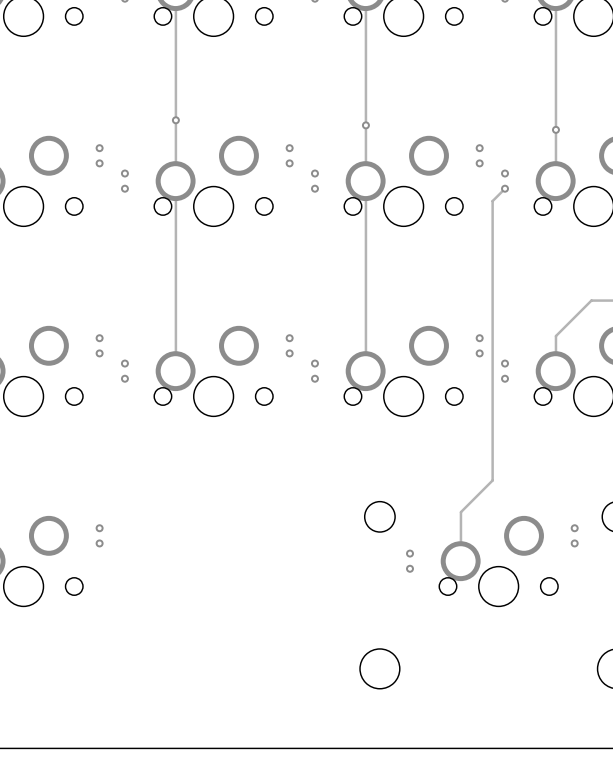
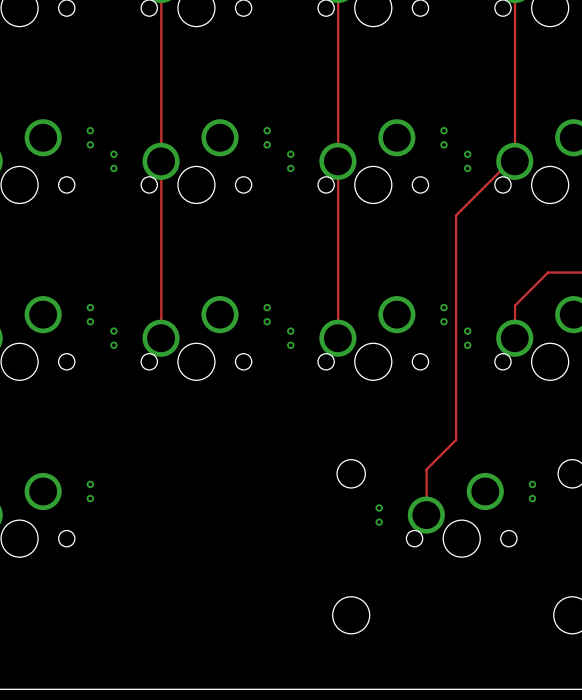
via: (175, 120) -> none
via: (365, 125) -> none
via: (555, 129) -> none
track: (505, 188) (492, 201) (492, 239) -> (510, 161) (456, 215)

